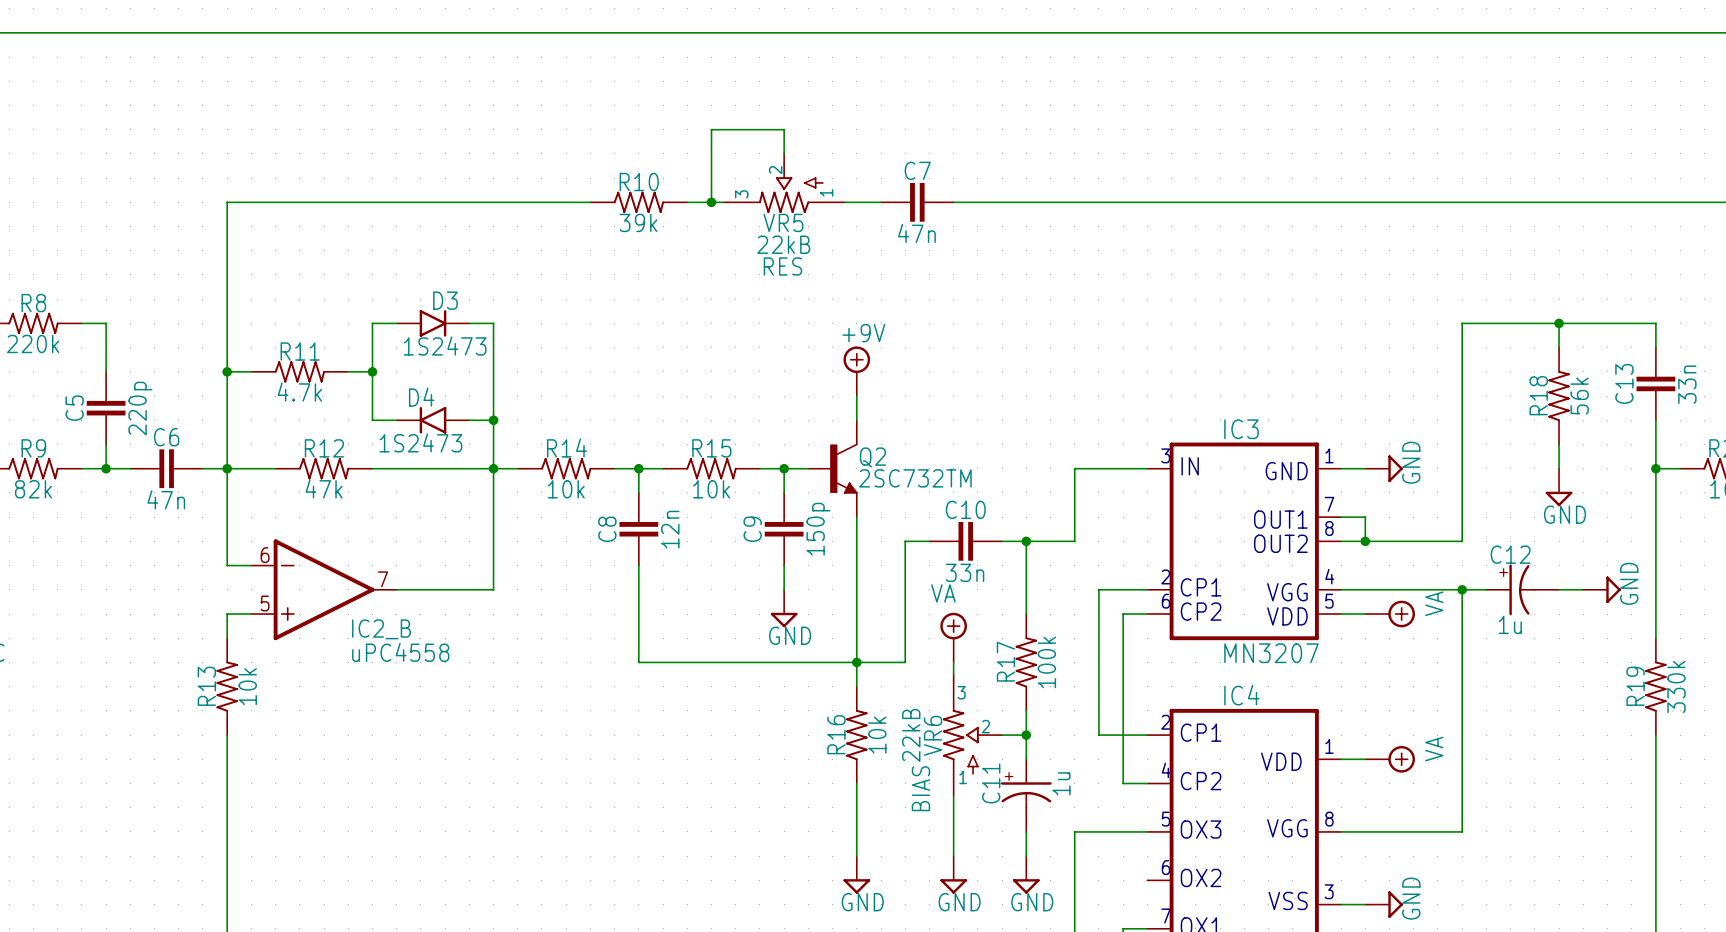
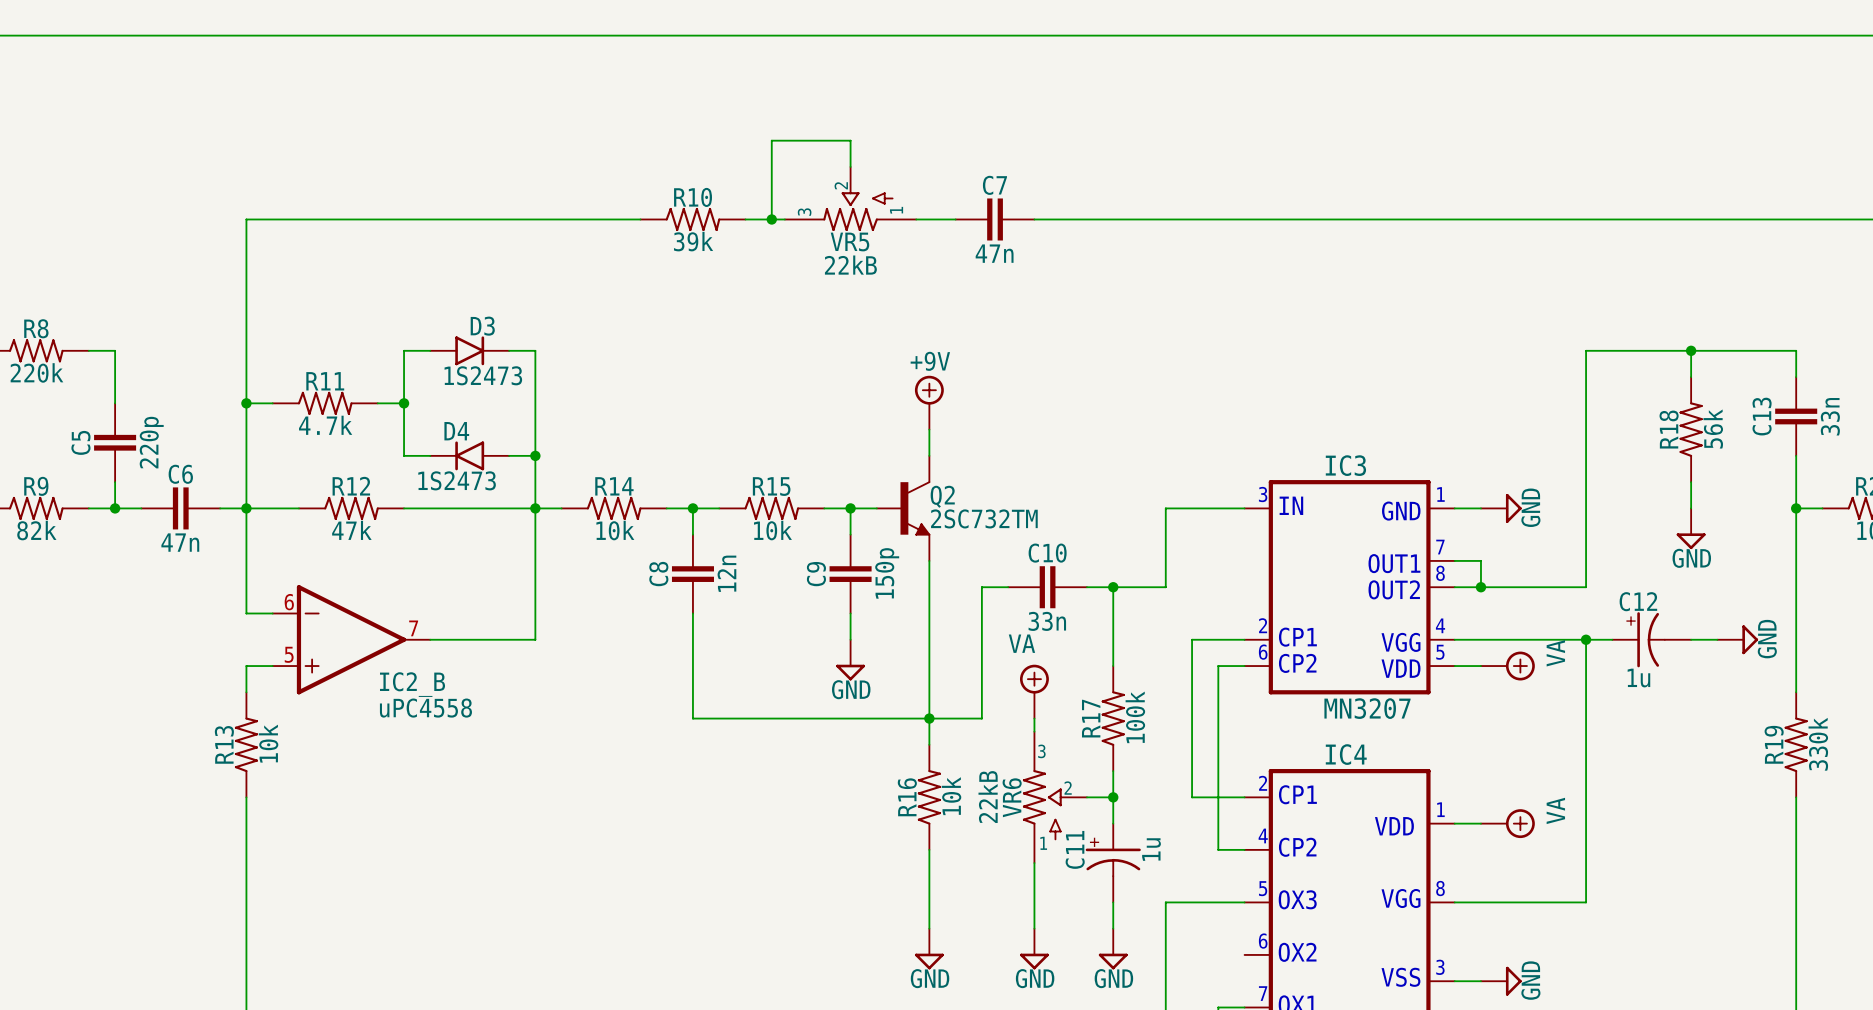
text: RES (782, 266) -> none
text: BIAS (920, 788) -> none

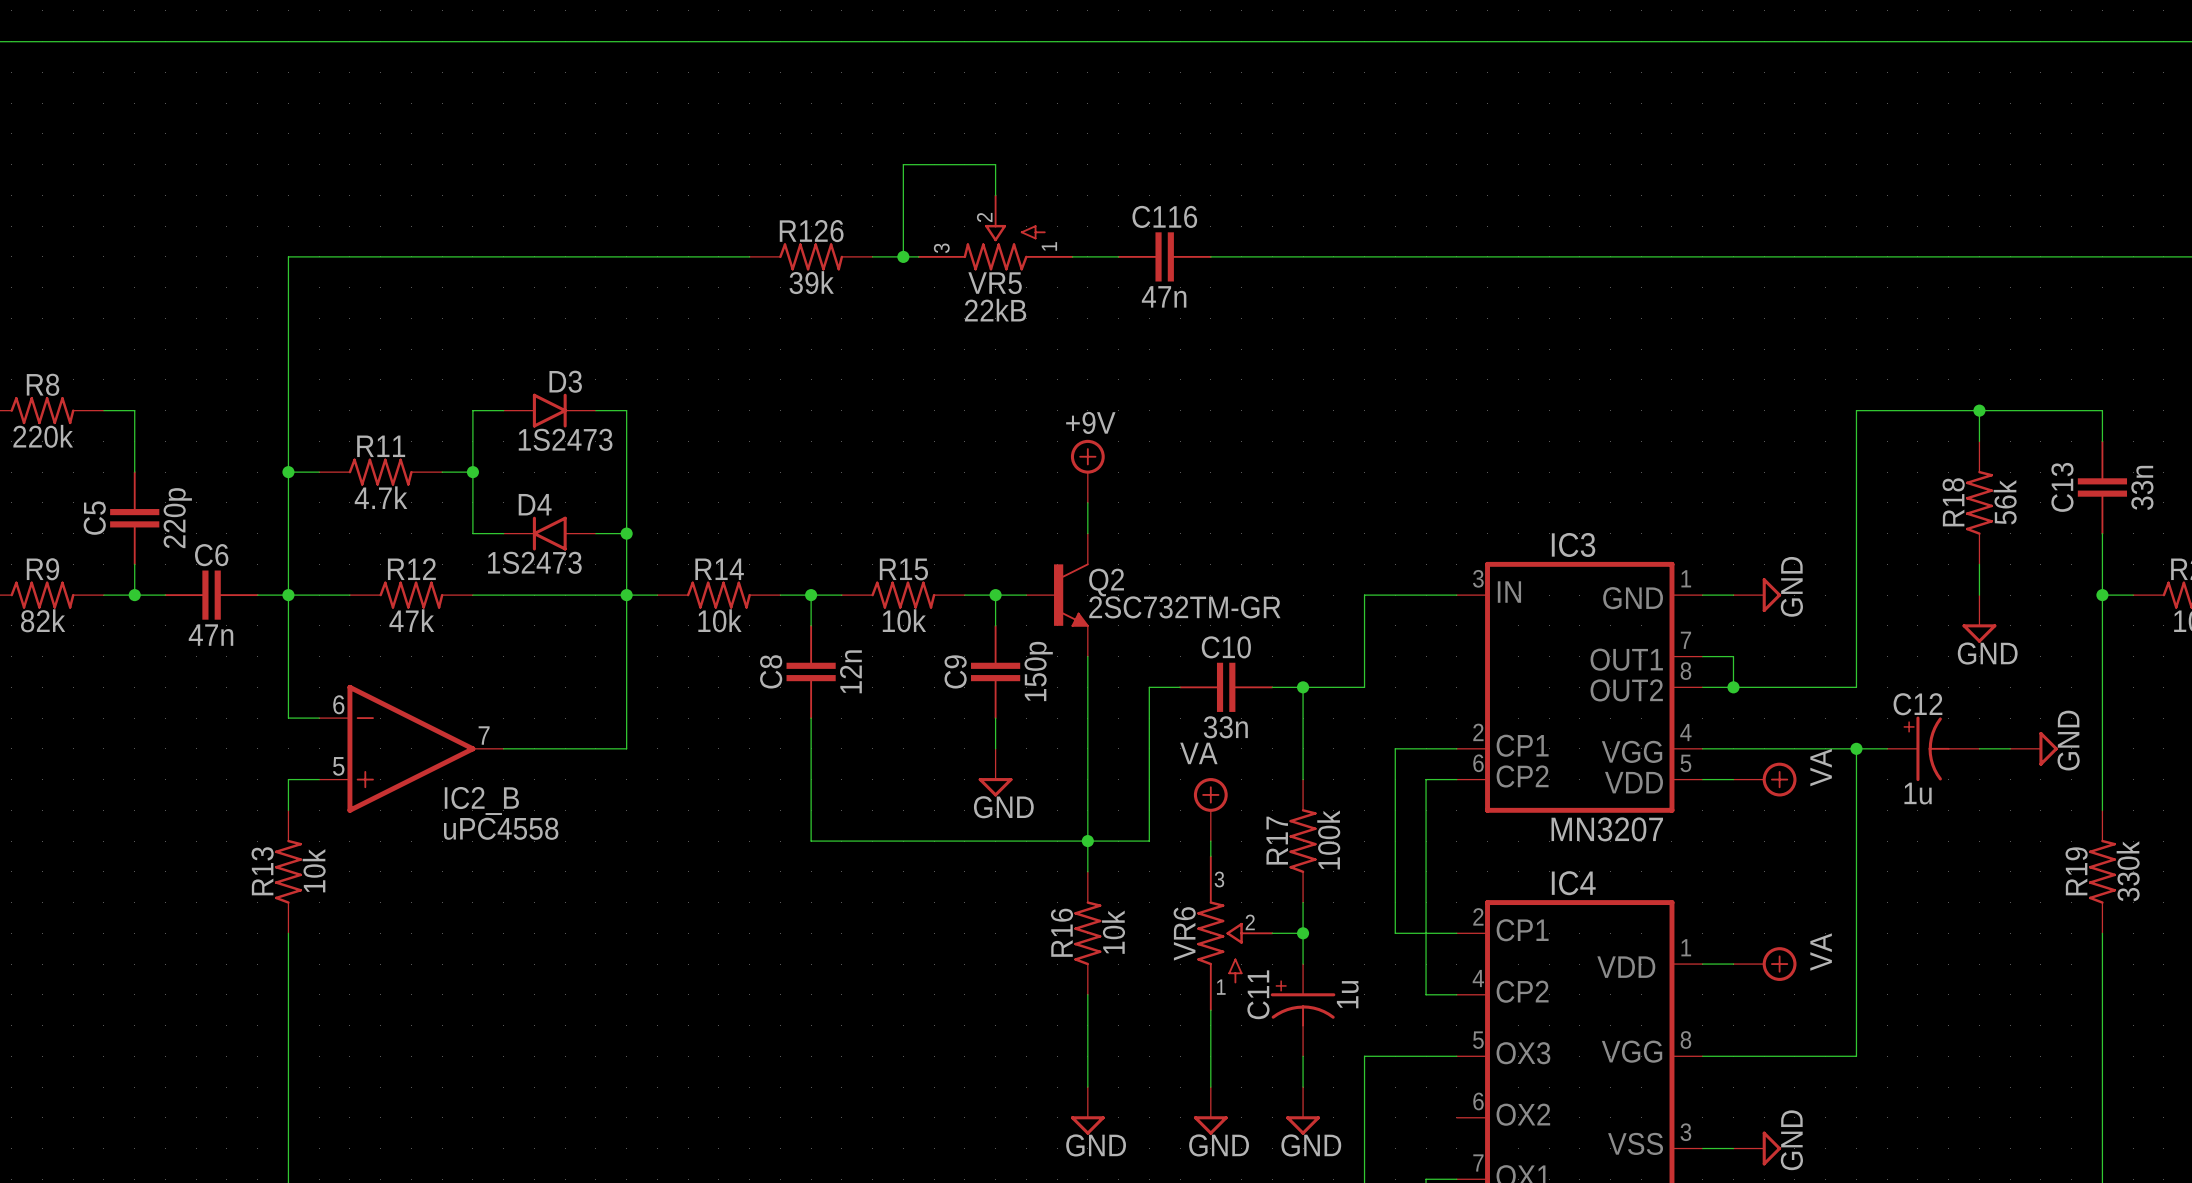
C7 name: C7 (994, 185) -> C116 (1164, 216)
R10 name: R10 (693, 197) -> R126 (811, 231)
Q2 value: 2SC732TM (984, 518) -> 2SC732TM-GR (1184, 607)
VR6 value: 22kB (988, 797) -> none

